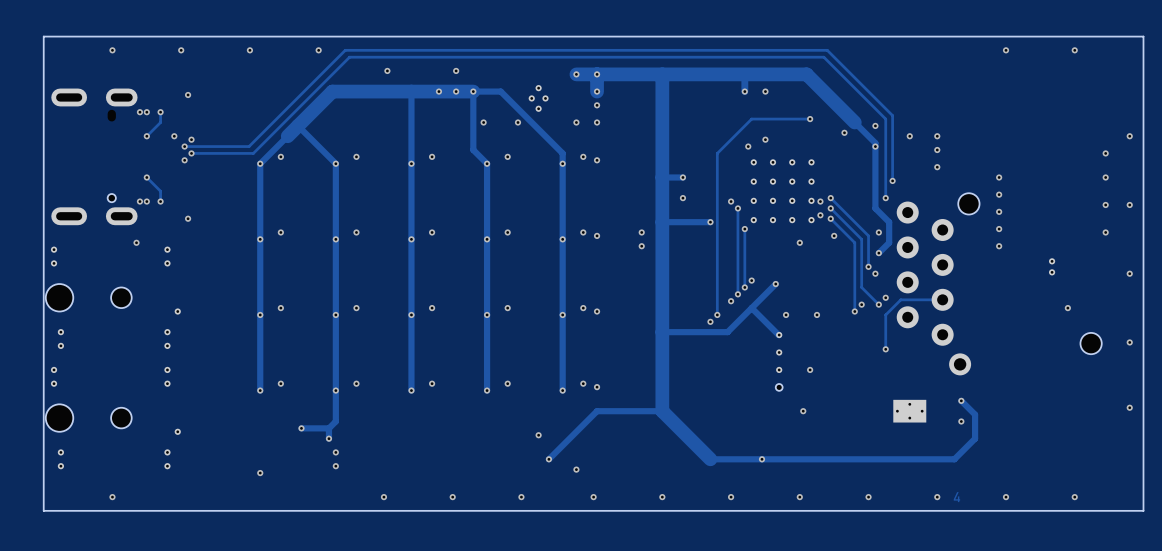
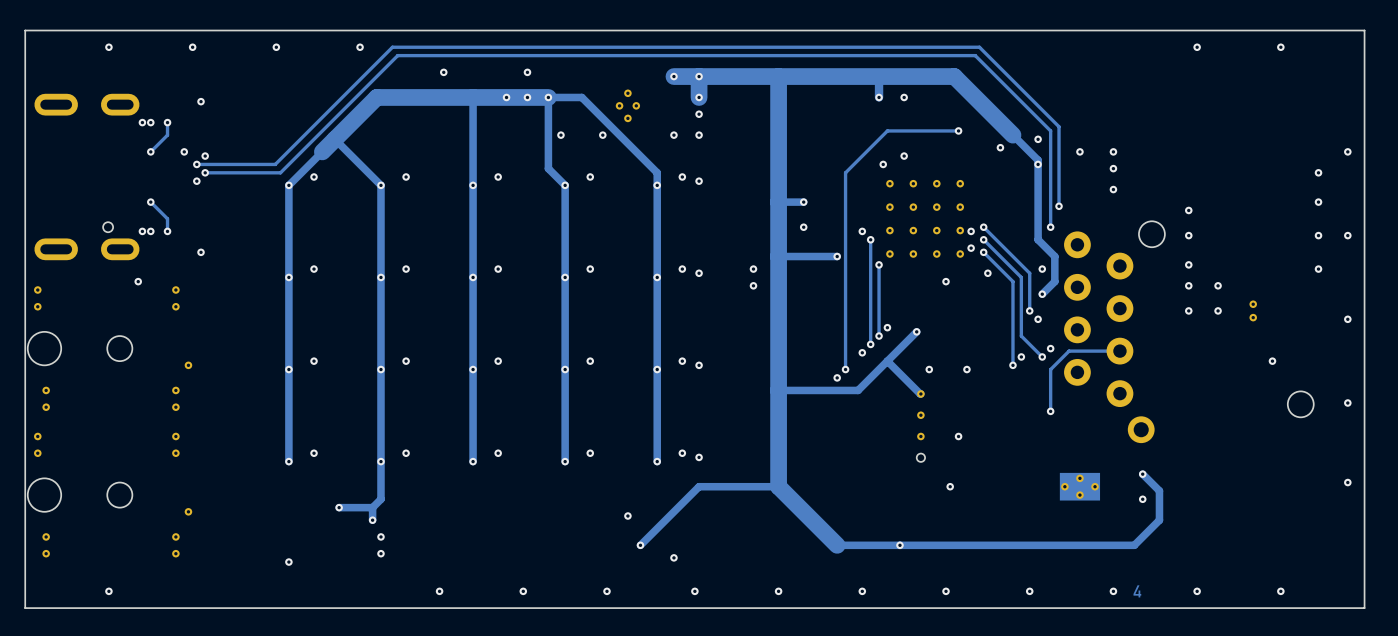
via: (999, 177) -> none
via: none -> (1188, 210)
via: (999, 194) -> none
via: none -> (1188, 235)
via: (999, 211) -> none
via: none -> (1218, 285)
via: none -> (1188, 310)
via: none -> (1218, 310)

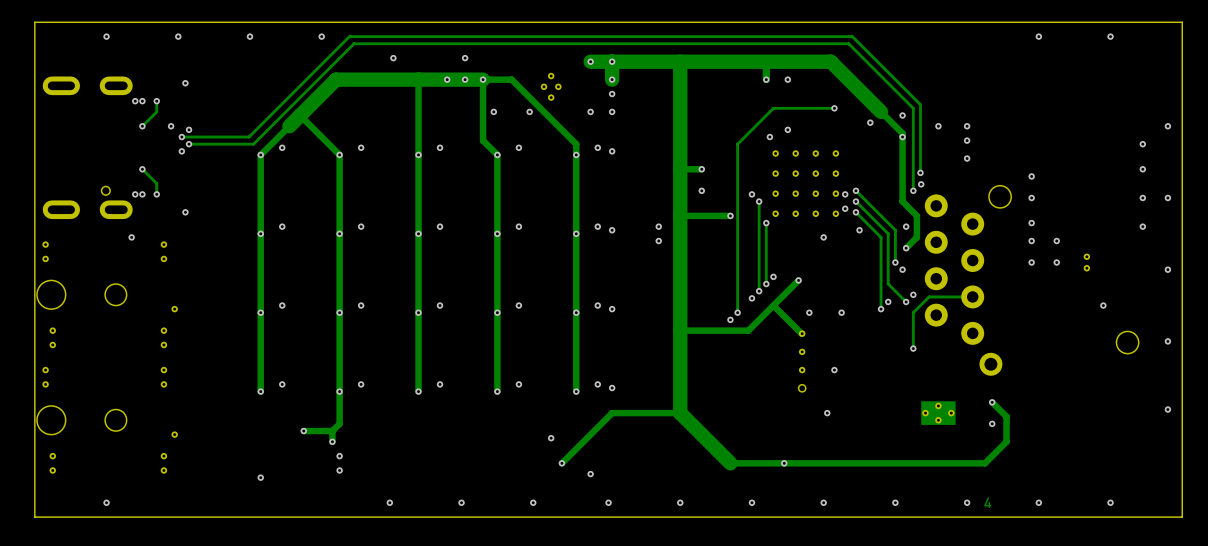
via: none -> (921, 184)

